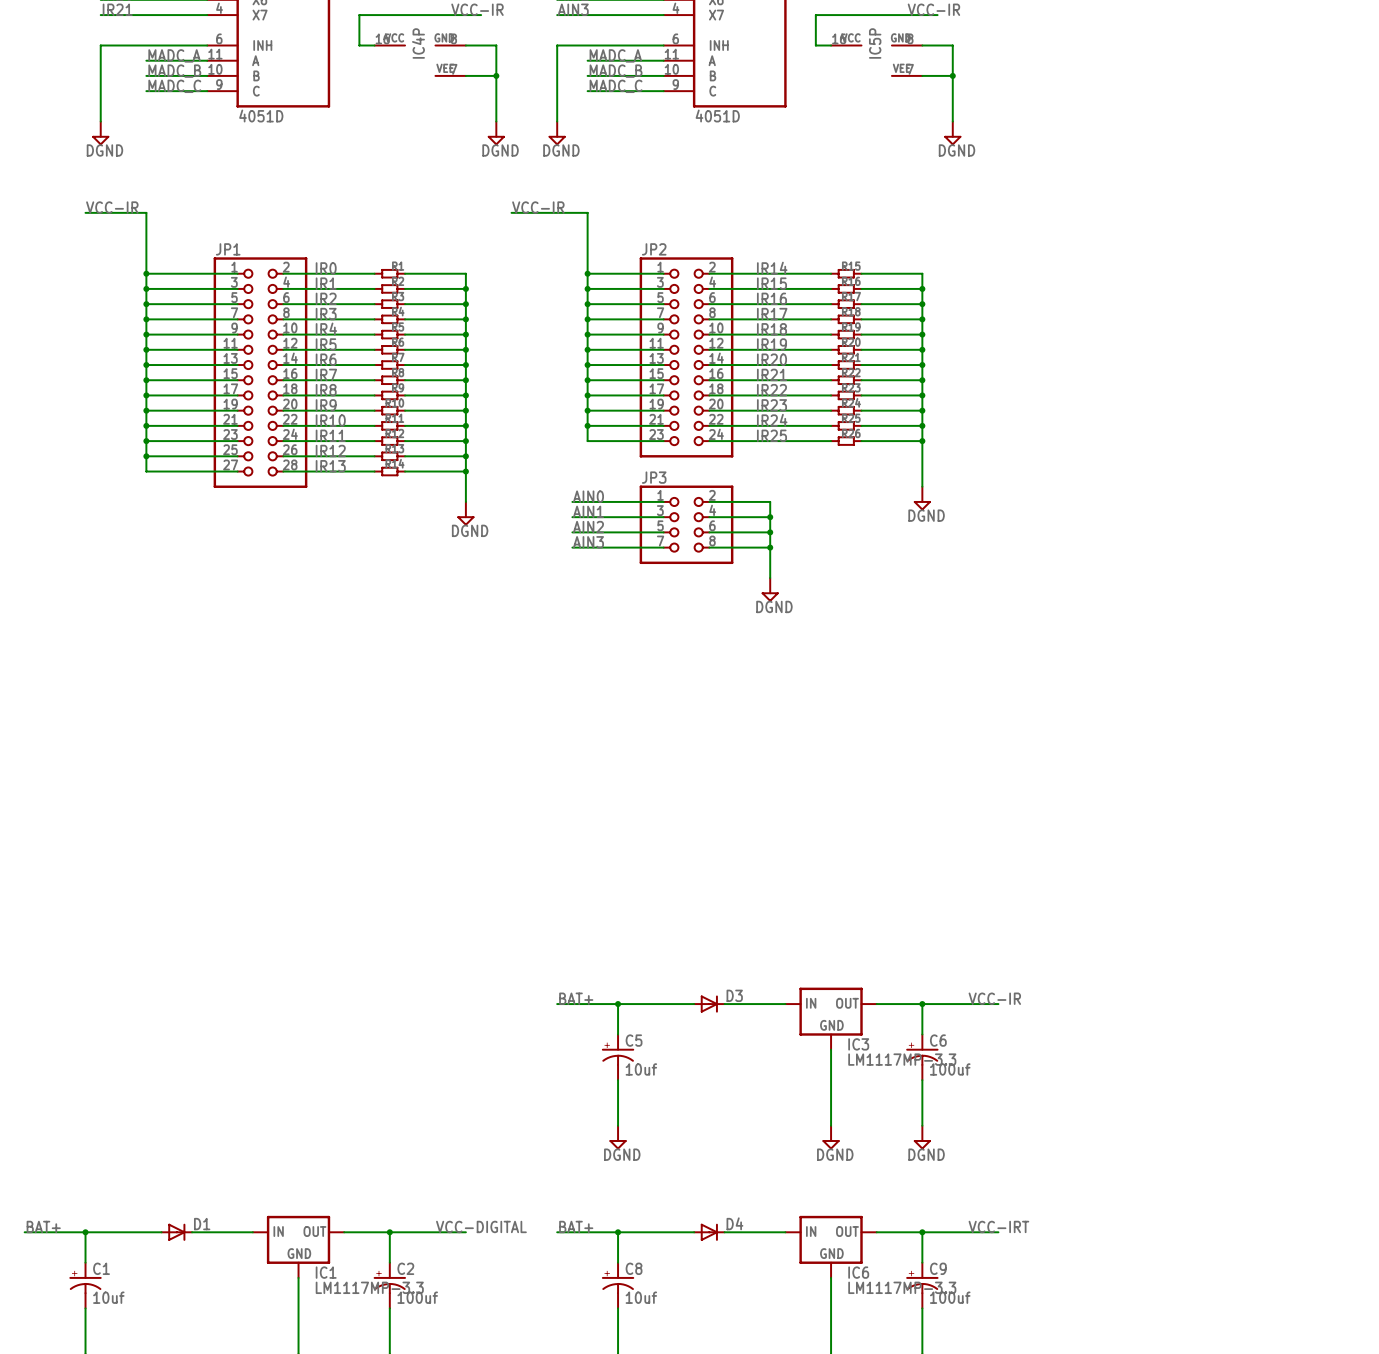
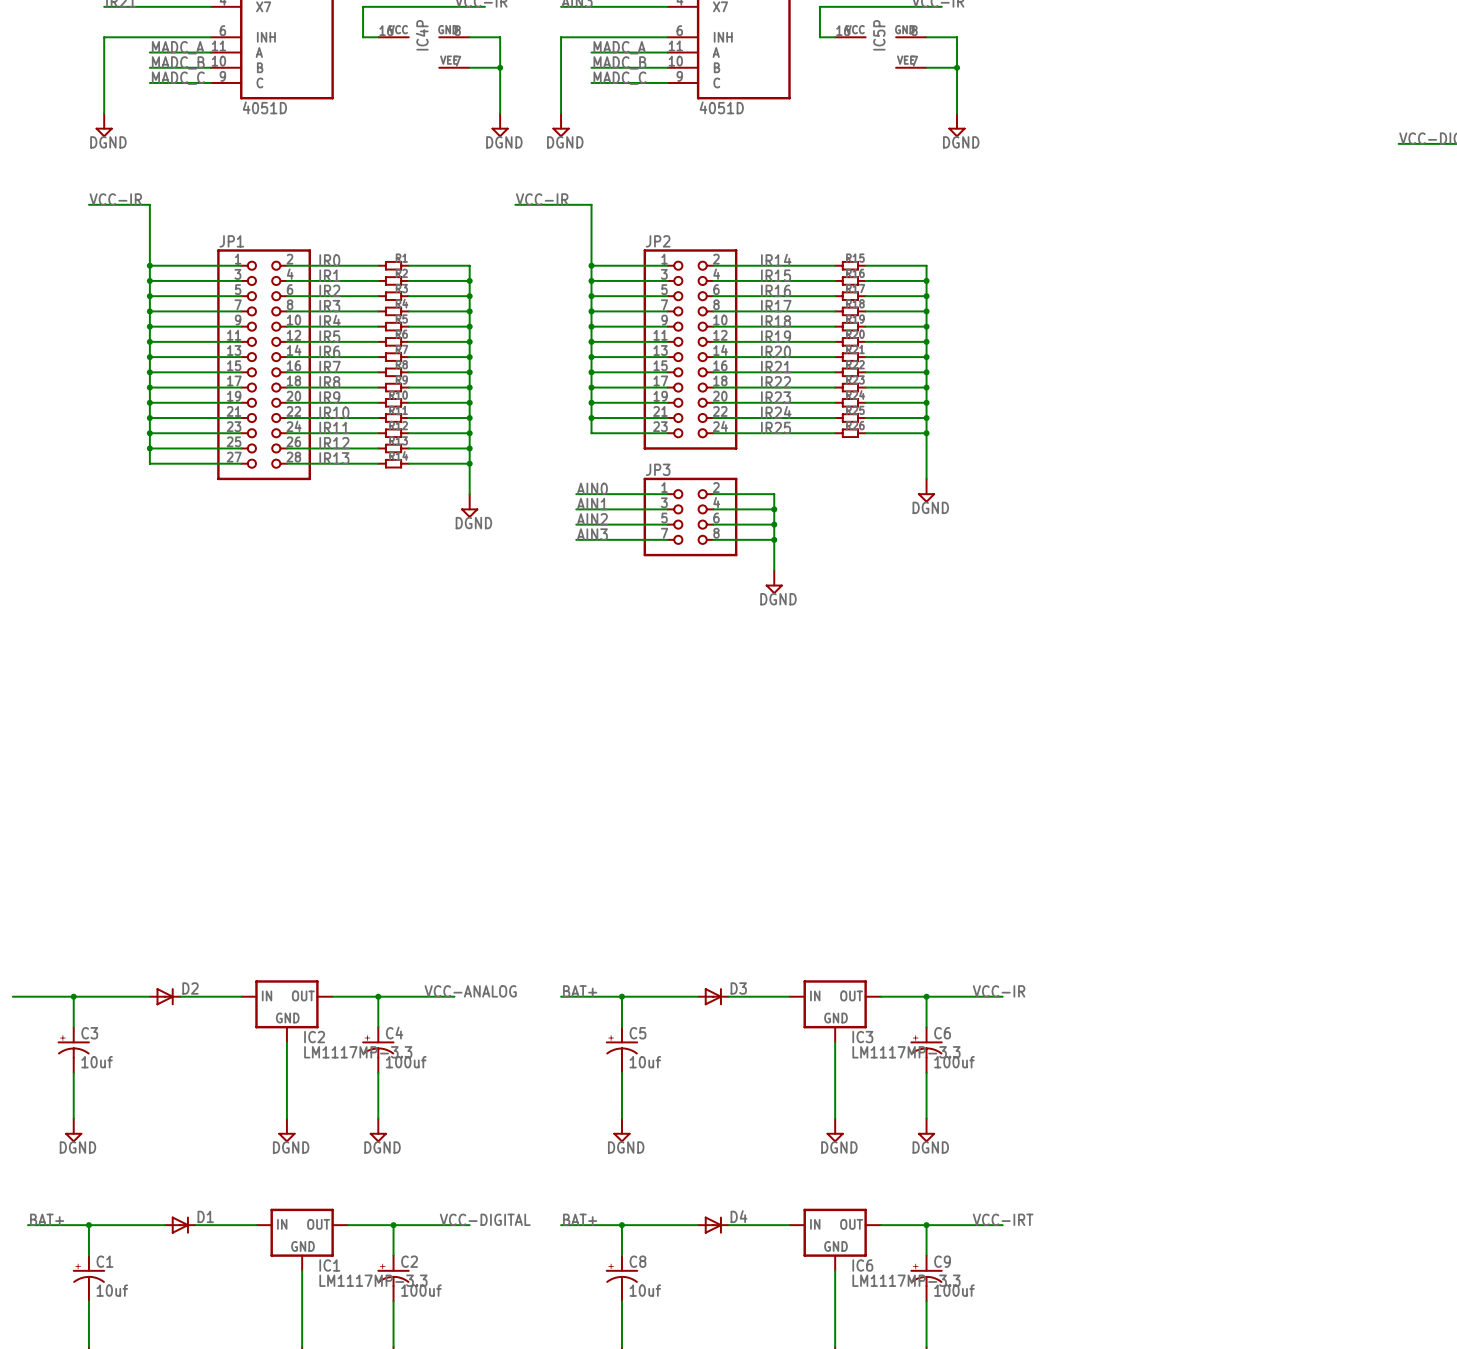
label: none -> VCC-ANALOG (470, 991)
wire: none -> (12, 996) (149, 996)
wire: none -> (73, 996) (73, 1027)
junction: none -> (73, 996)
D2: none -> (165, 996)
wire: none -> (180, 996) (241, 996)
wire: none -> (332, 996) (454, 996)
wire: none -> (378, 996) (378, 1027)
junction: none -> (378, 996)
IC2: none -> LM1117MP-3.3 (286, 1011)
wire: none -> (286, 1042) (286, 1118)
C3: none -> 10uf (73, 1050)
C4: none -> 100uf (378, 1050)
wire: none -> (73, 1072) (73, 1118)
wire: none -> (378, 1072) (378, 1118)
power symbol: none -> DGND (73, 1130)
power symbol: none -> DGND (286, 1130)
power symbol: none -> DGND (378, 1130)

